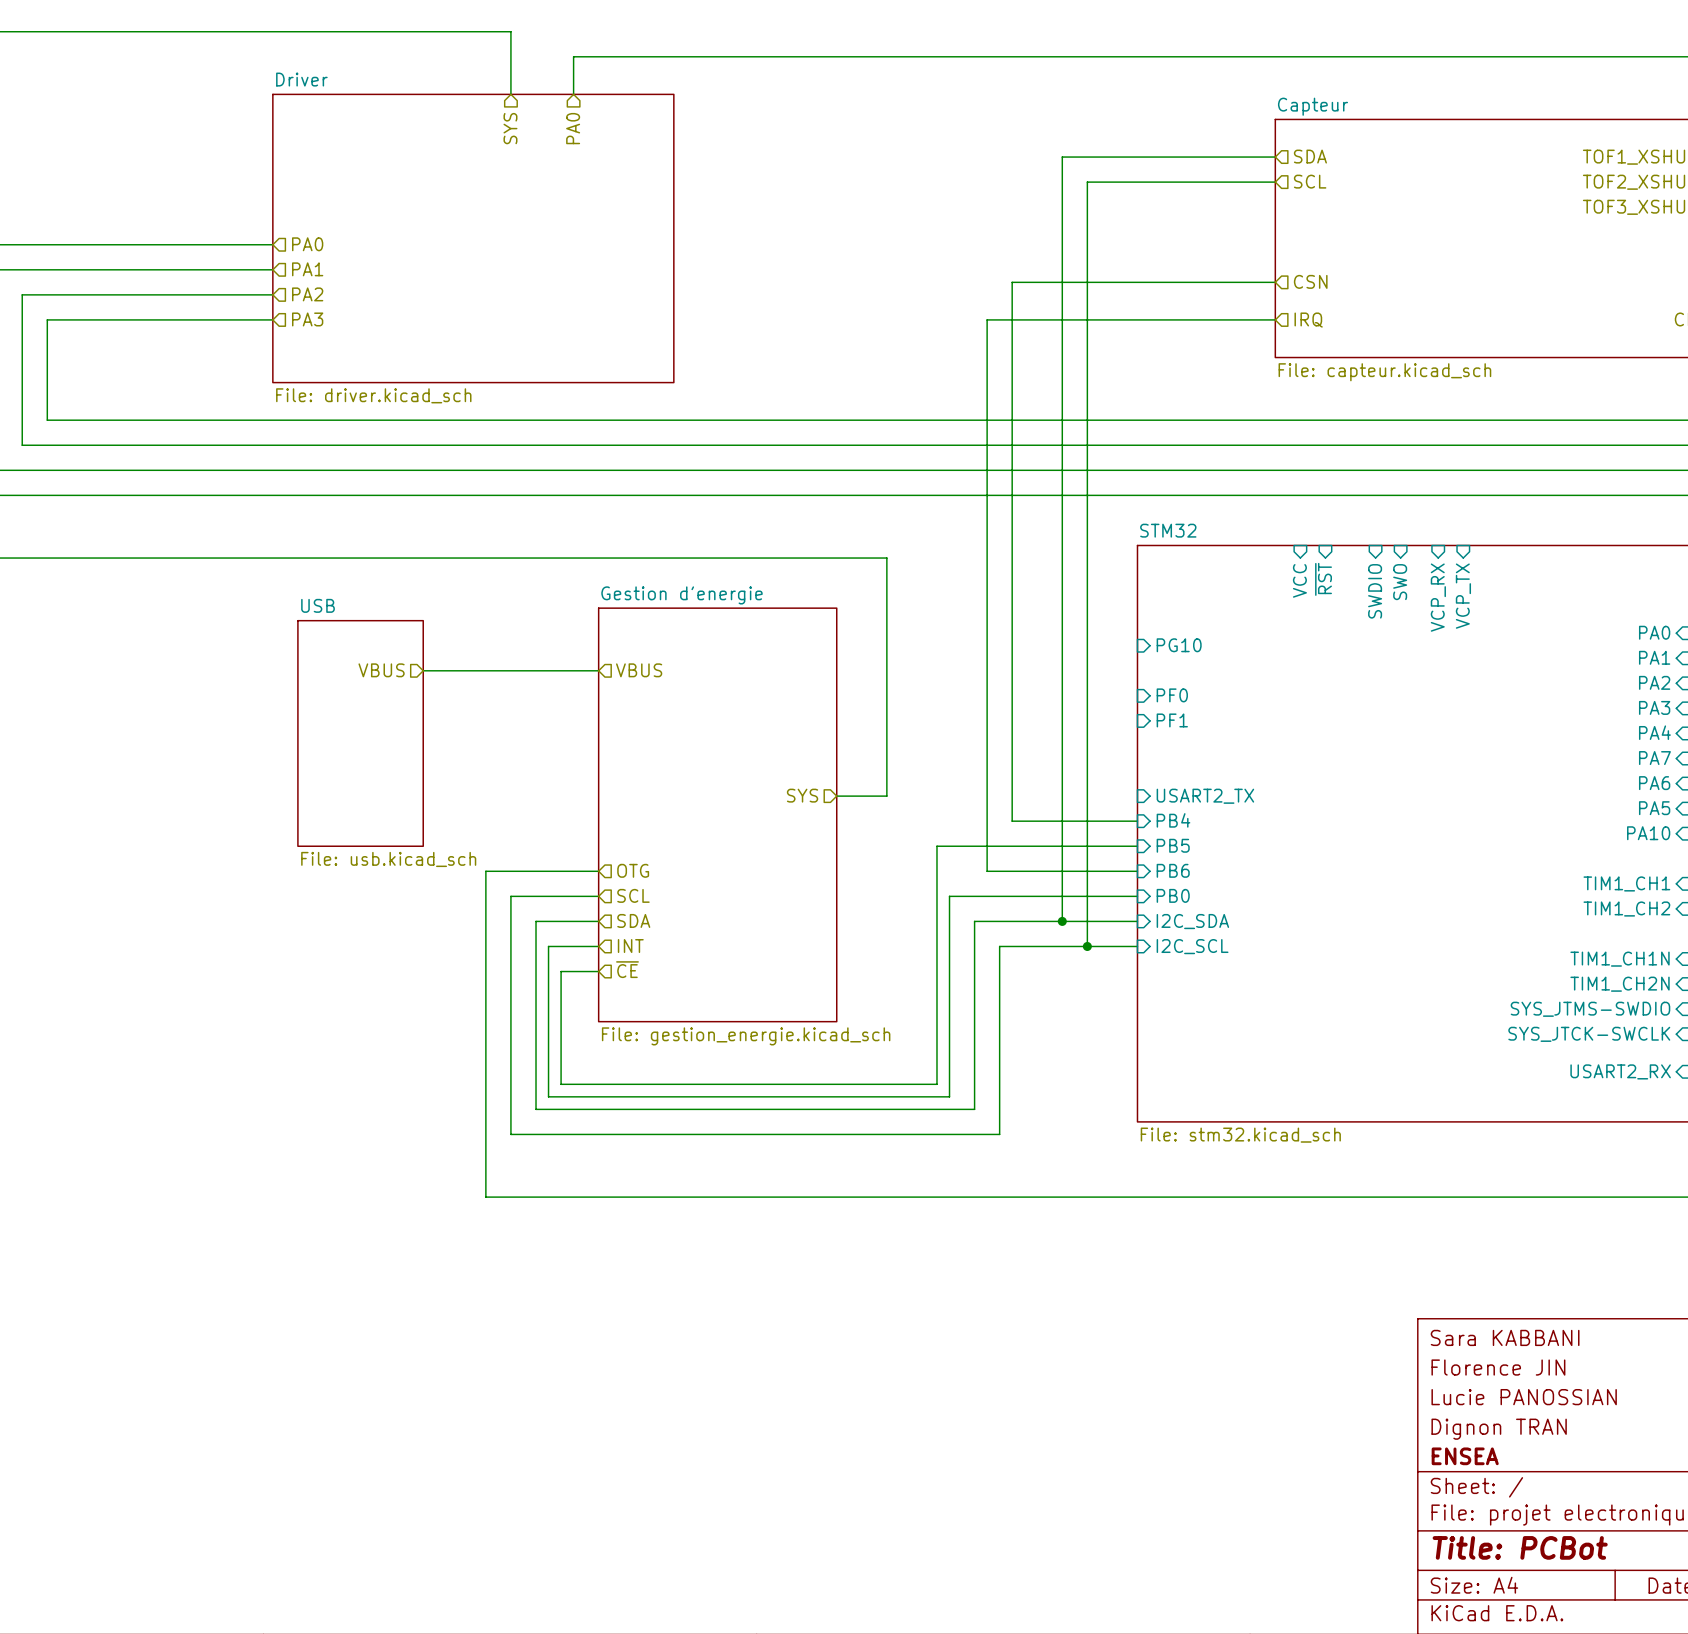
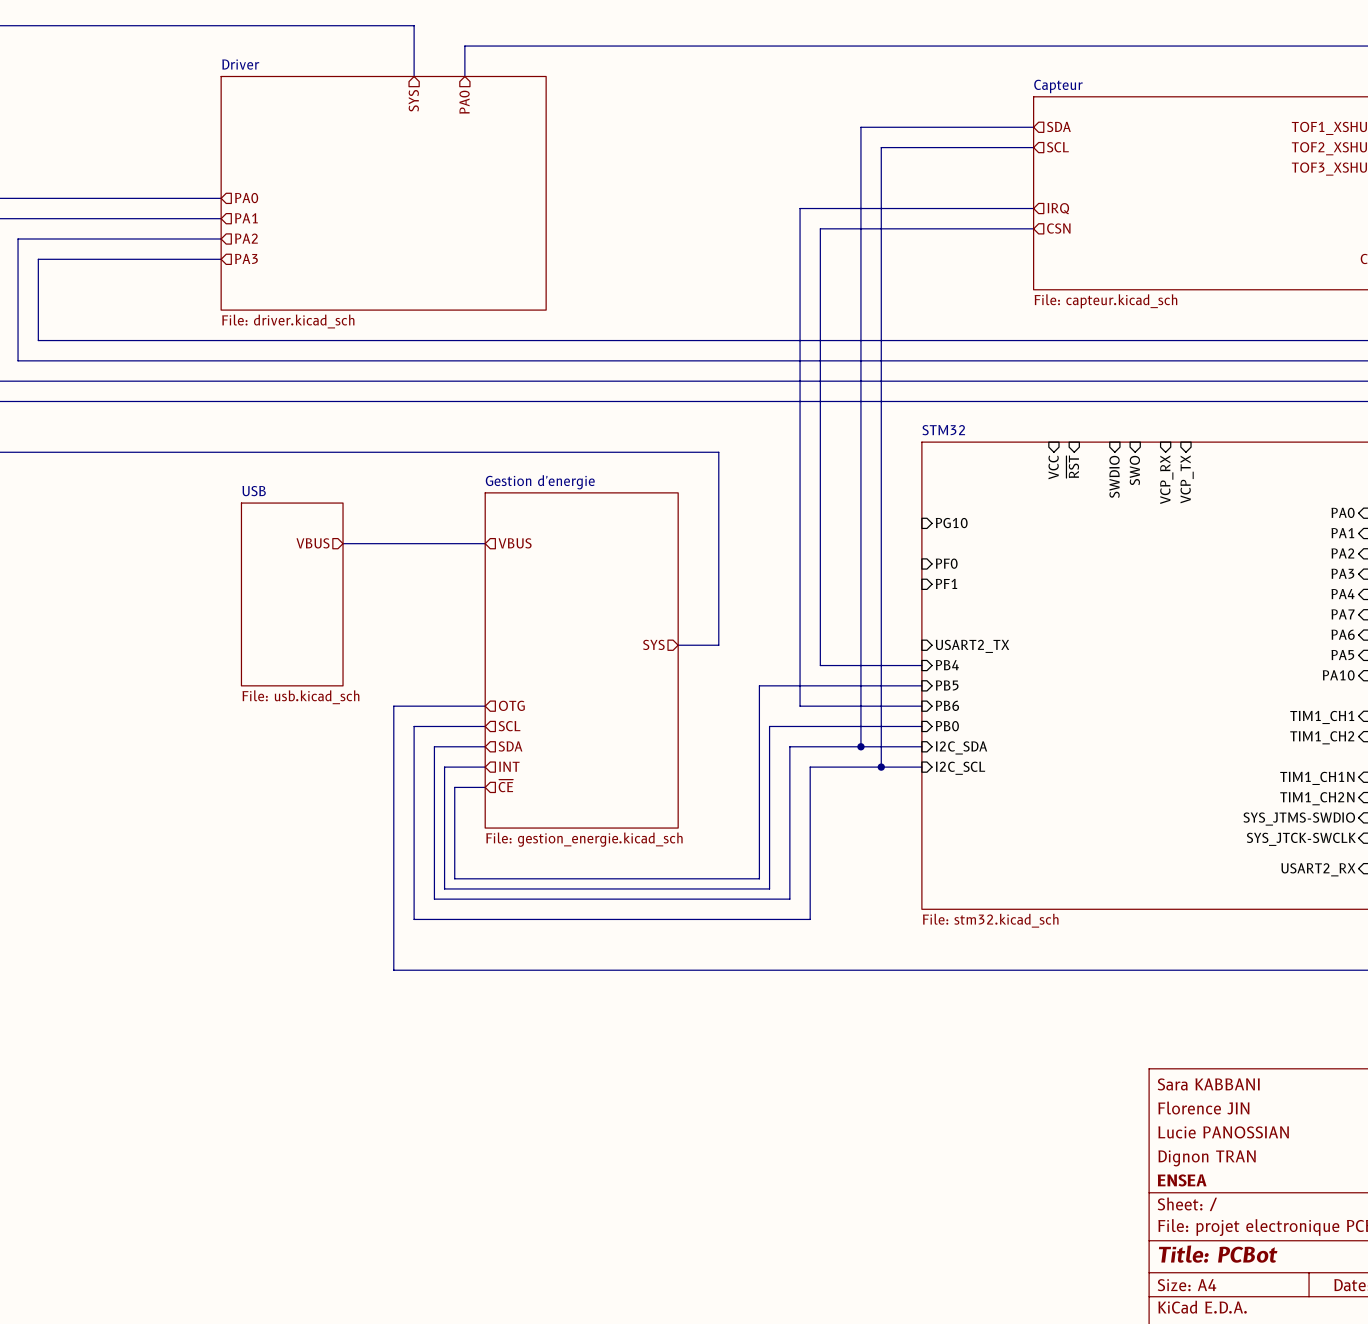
wire: (987, 319) (1275, 319) -> (800, 259) (800, 208) (1033, 208)
hierarchical label position: IRQ (1308, 320) -> IRQ (1058, 208)

